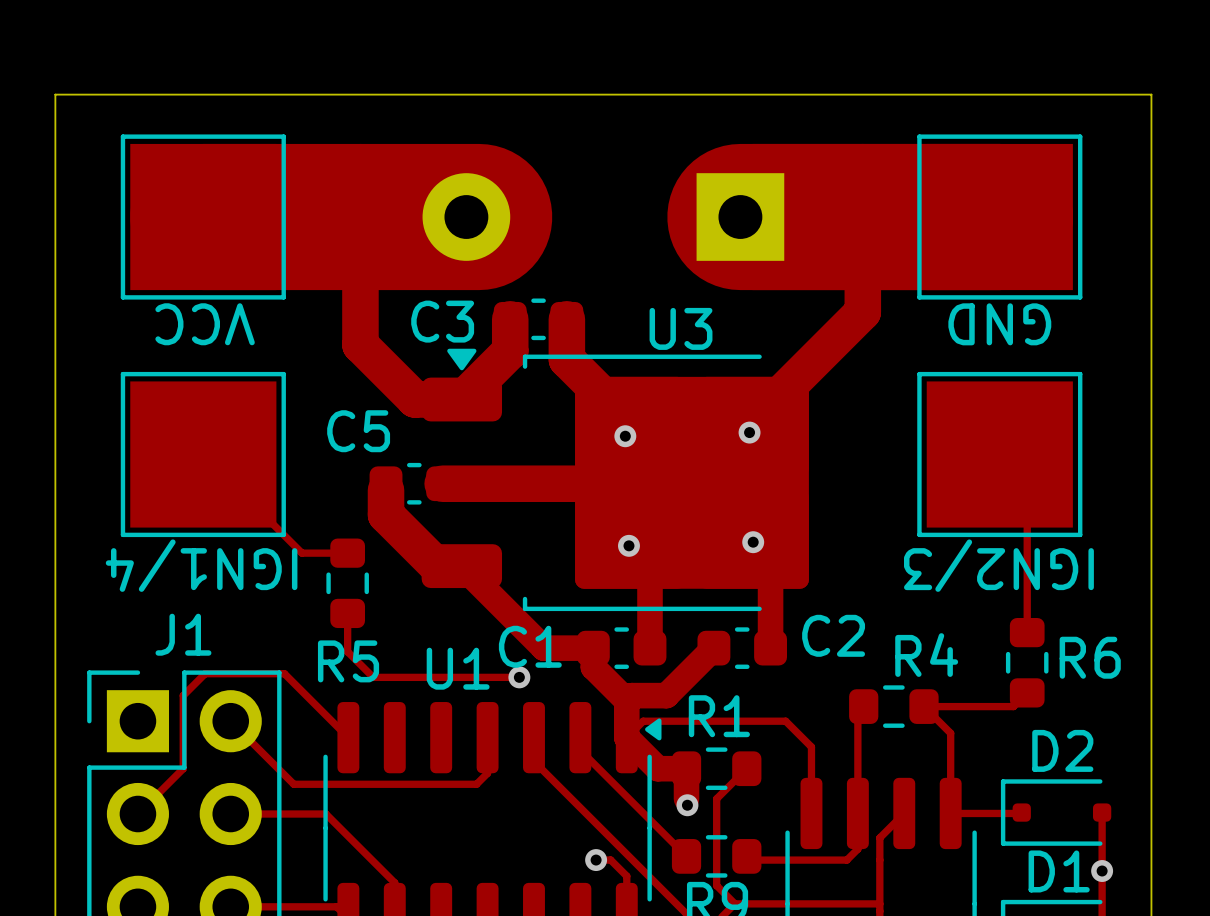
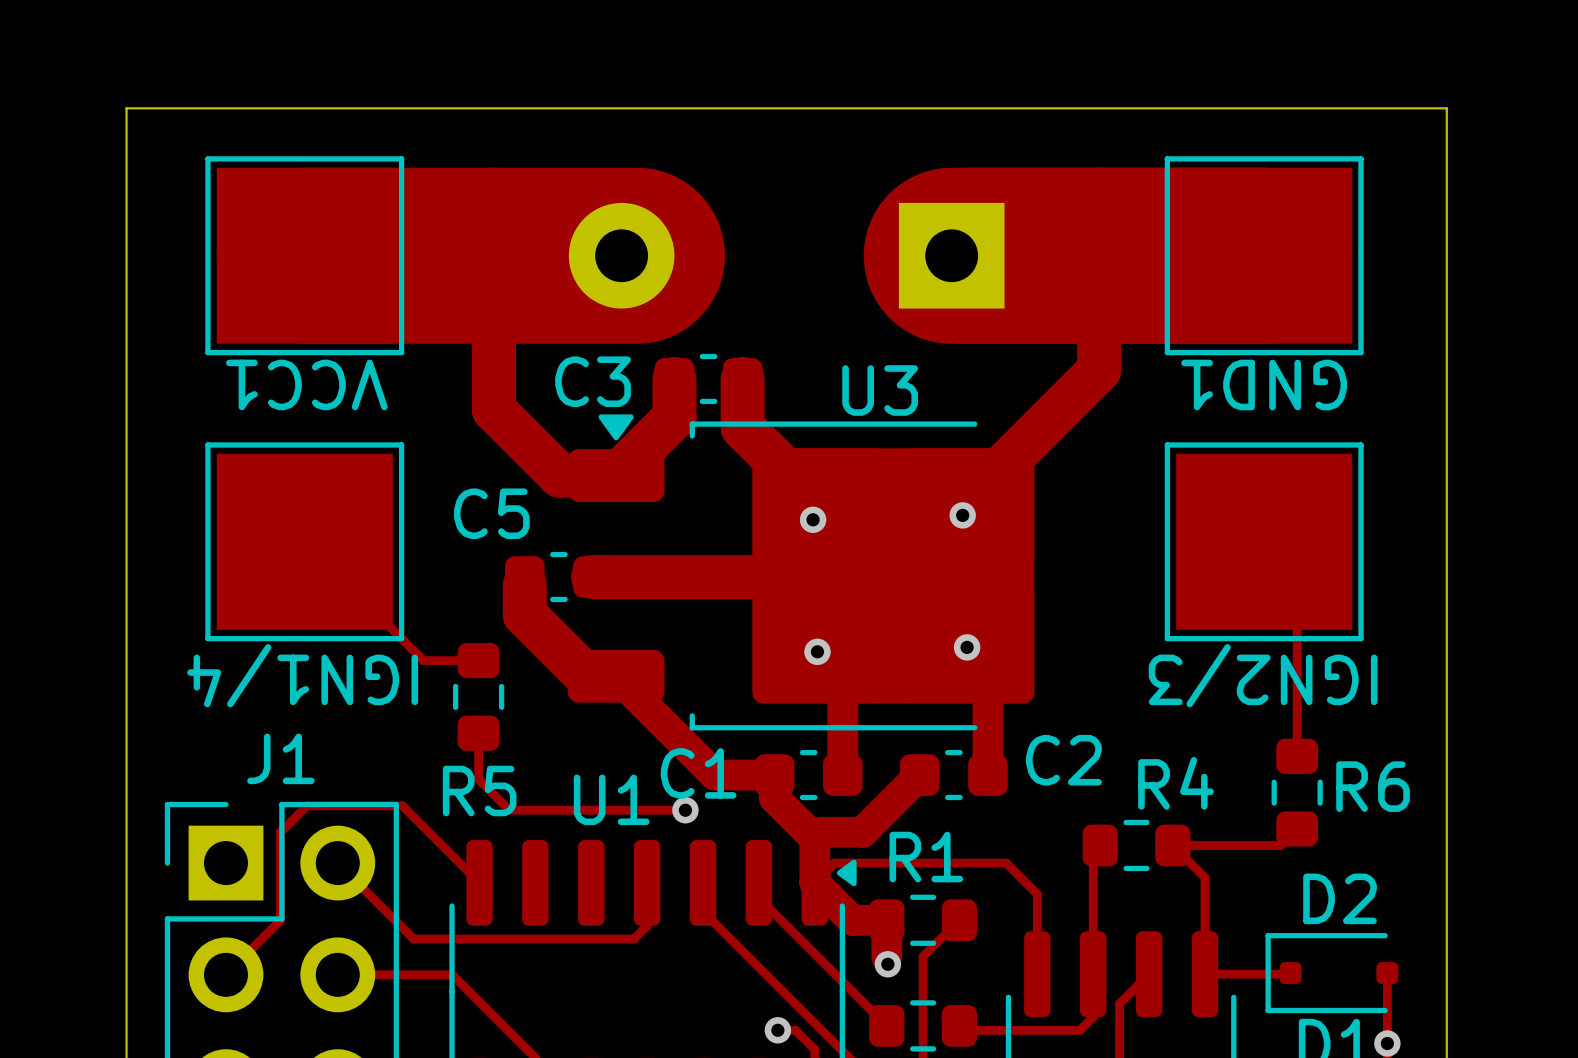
VCC name: VCC (205, 324) -> VCC1 (306, 384)
GND name: GND (999, 324) -> GND1 (1264, 385)

